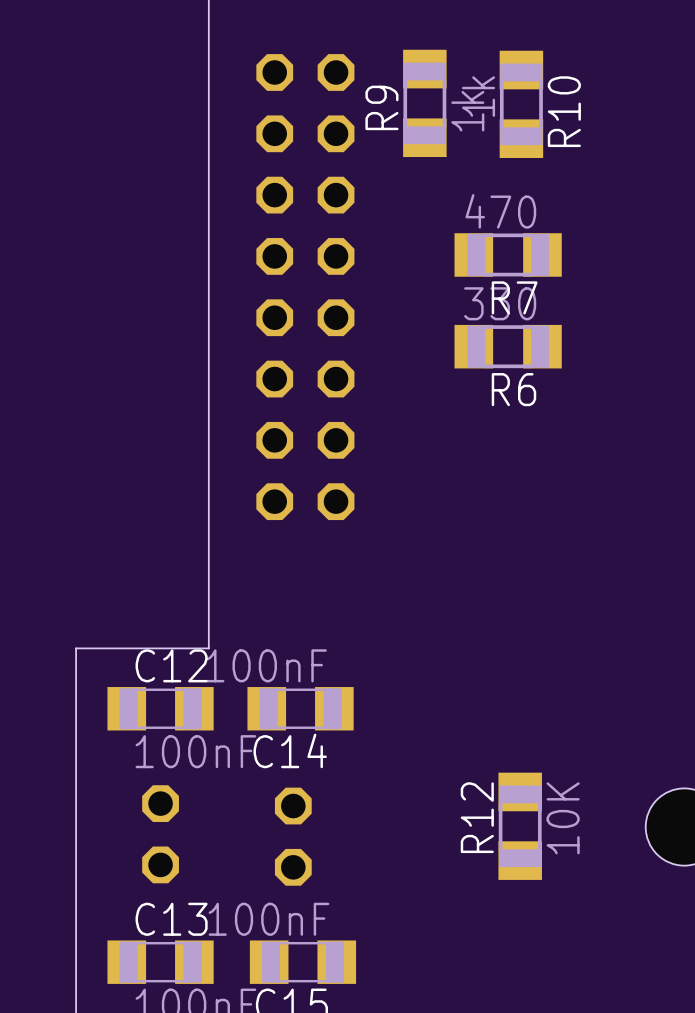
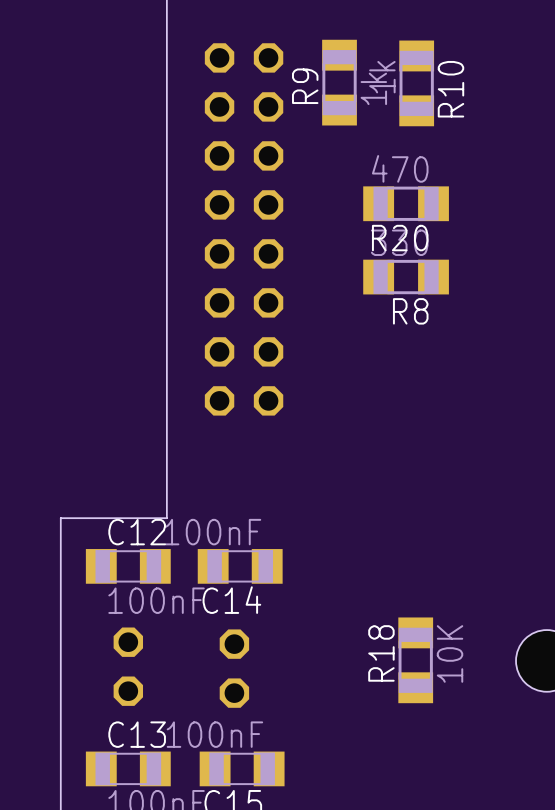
R7 name: R7 (514, 297) -> R20 (400, 238)
R6 name: R6 (513, 389) -> R8 (410, 311)
R12 name: R12 (477, 817) -> R18 (381, 653)

